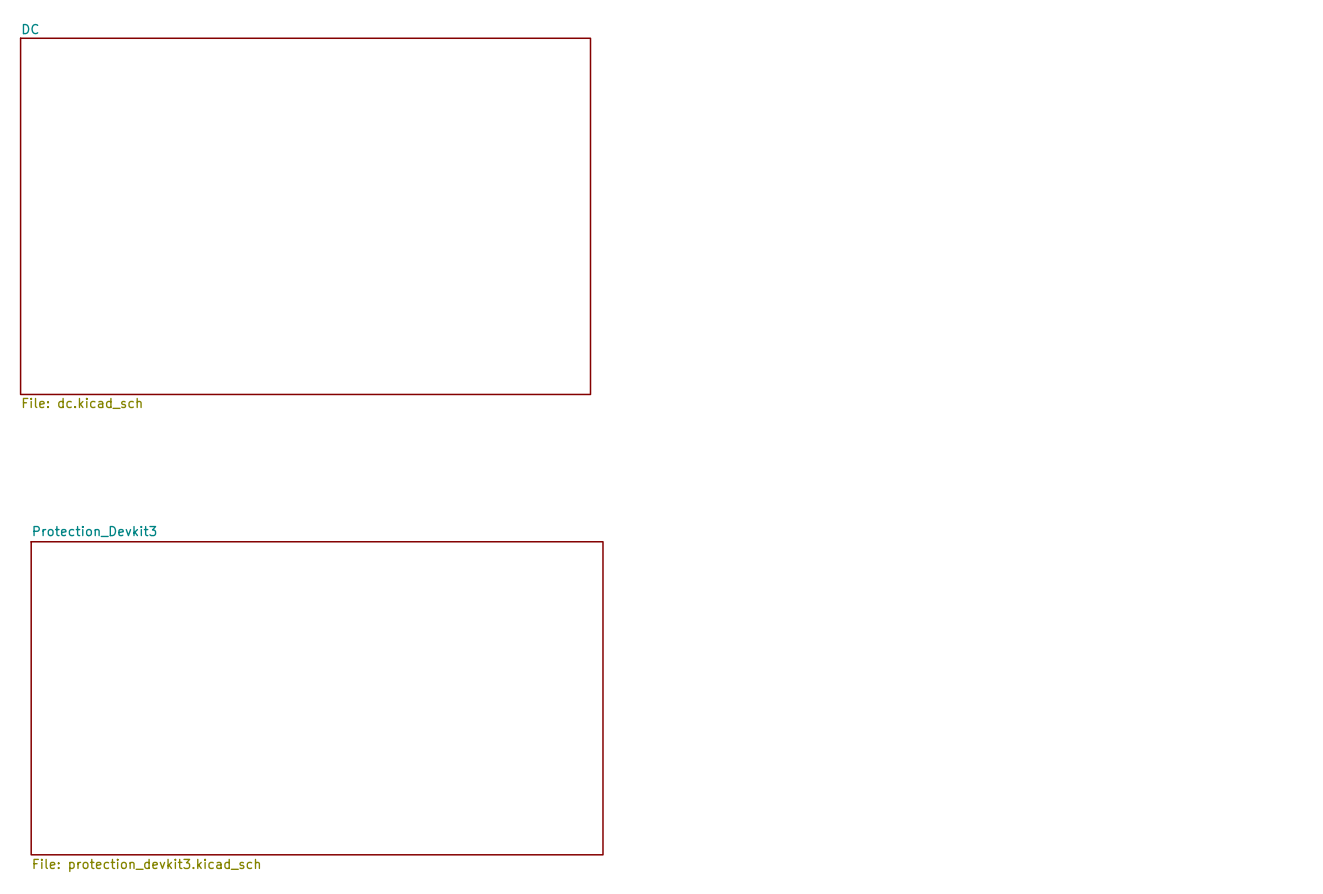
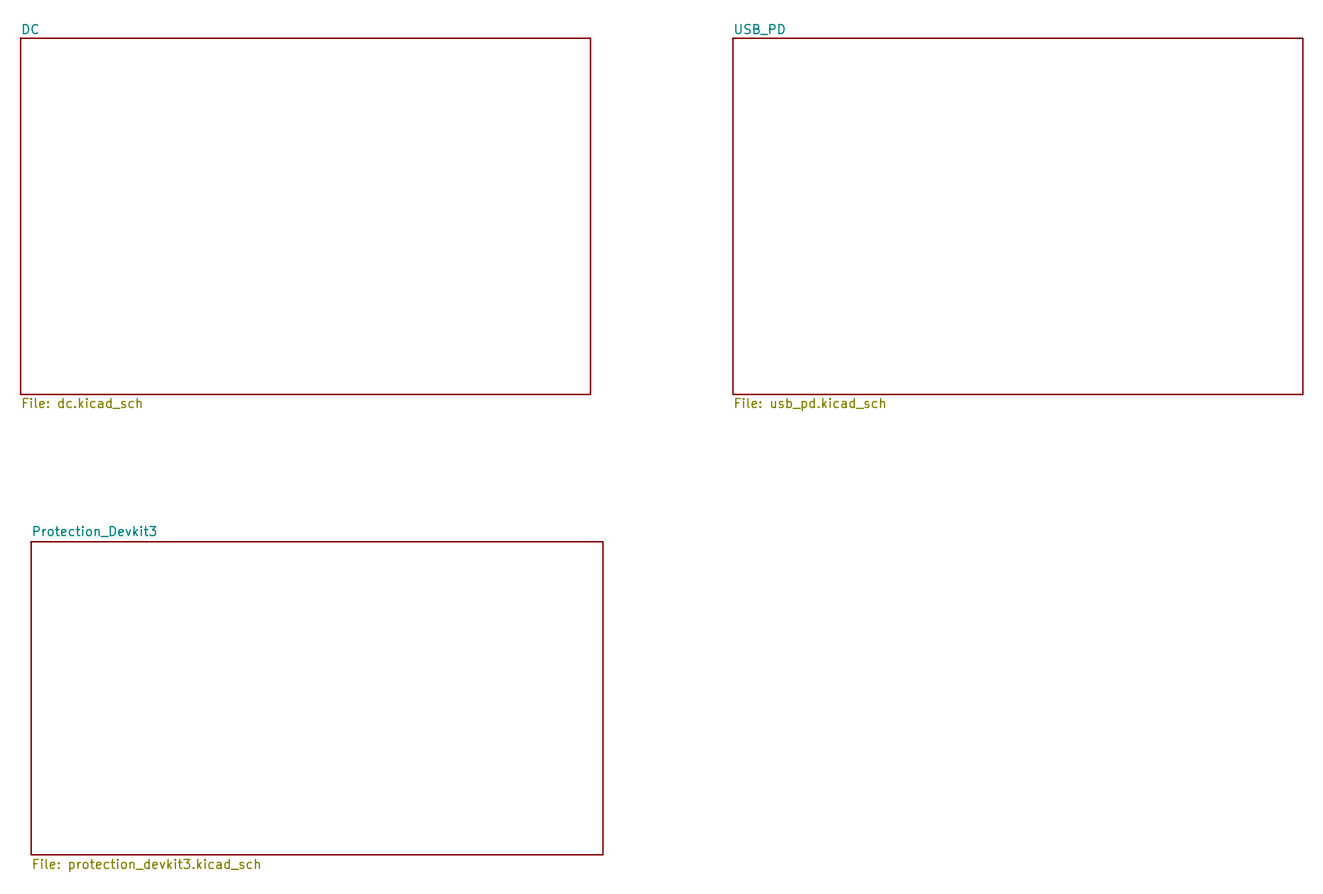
sheet USB_PD: none -> File: usb_pd.kicad_sch (1017, 216)

